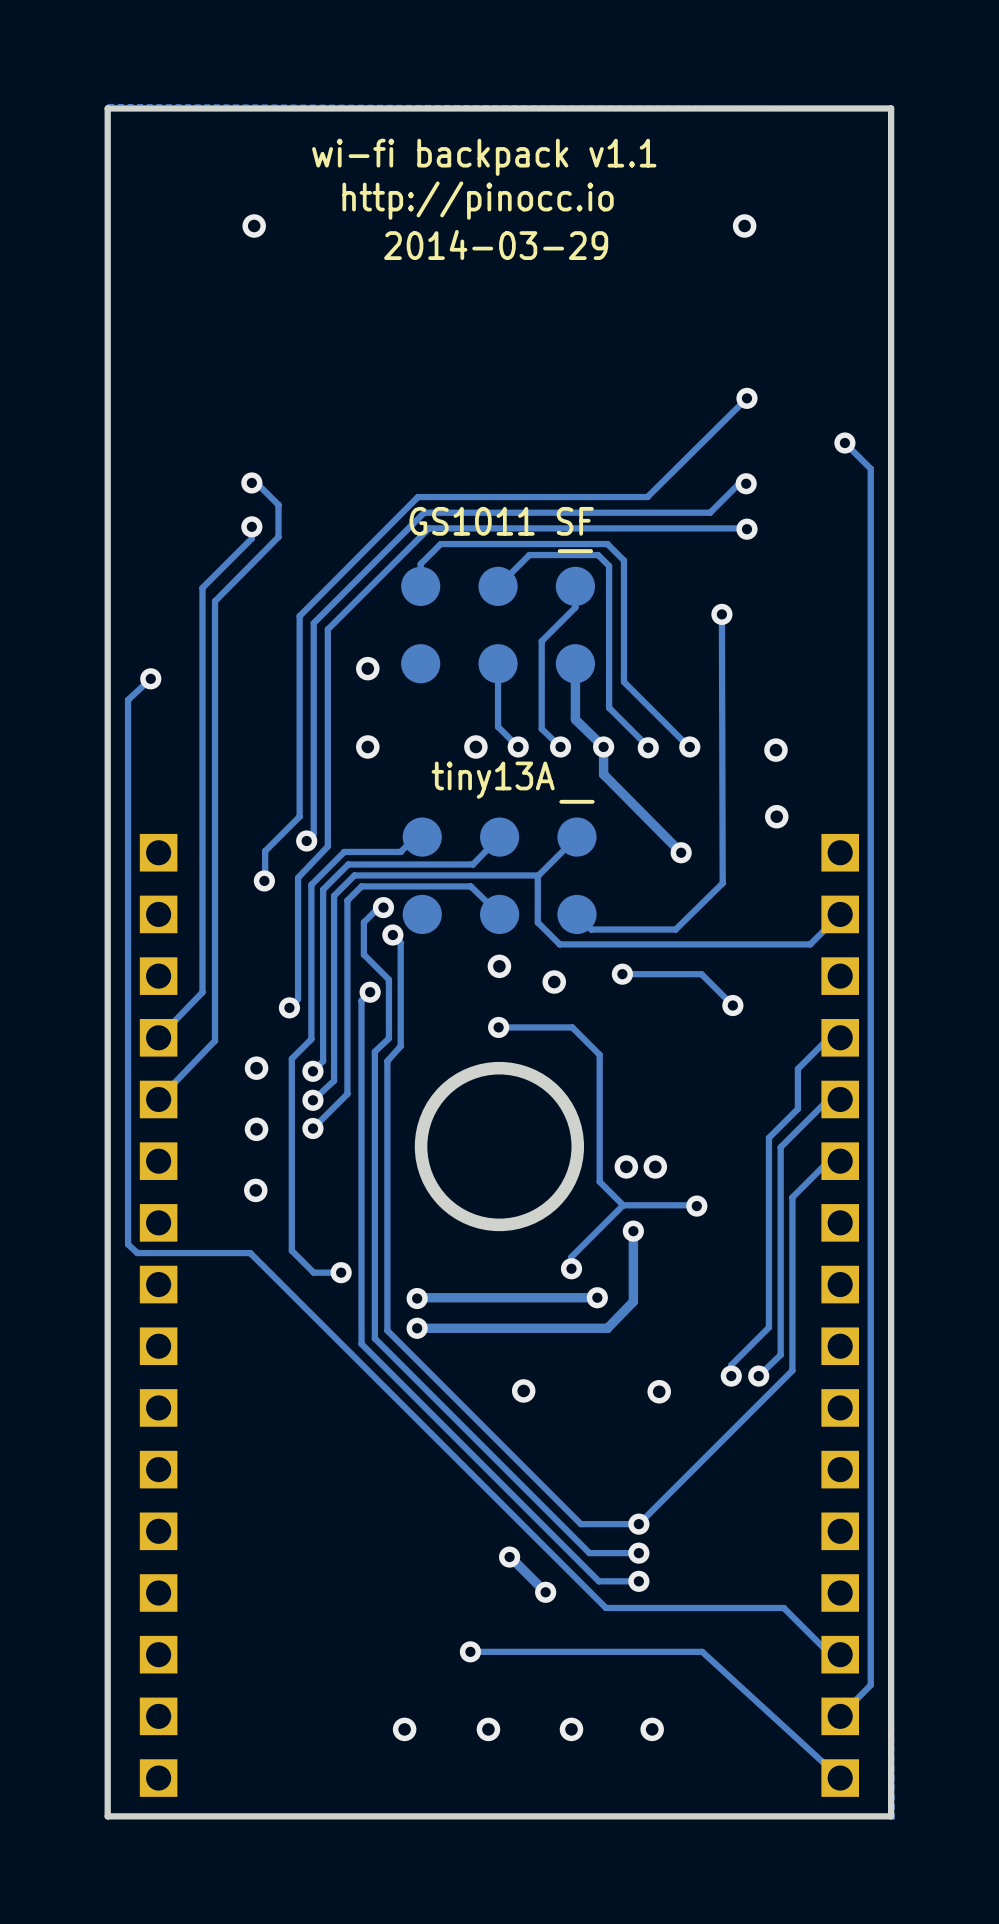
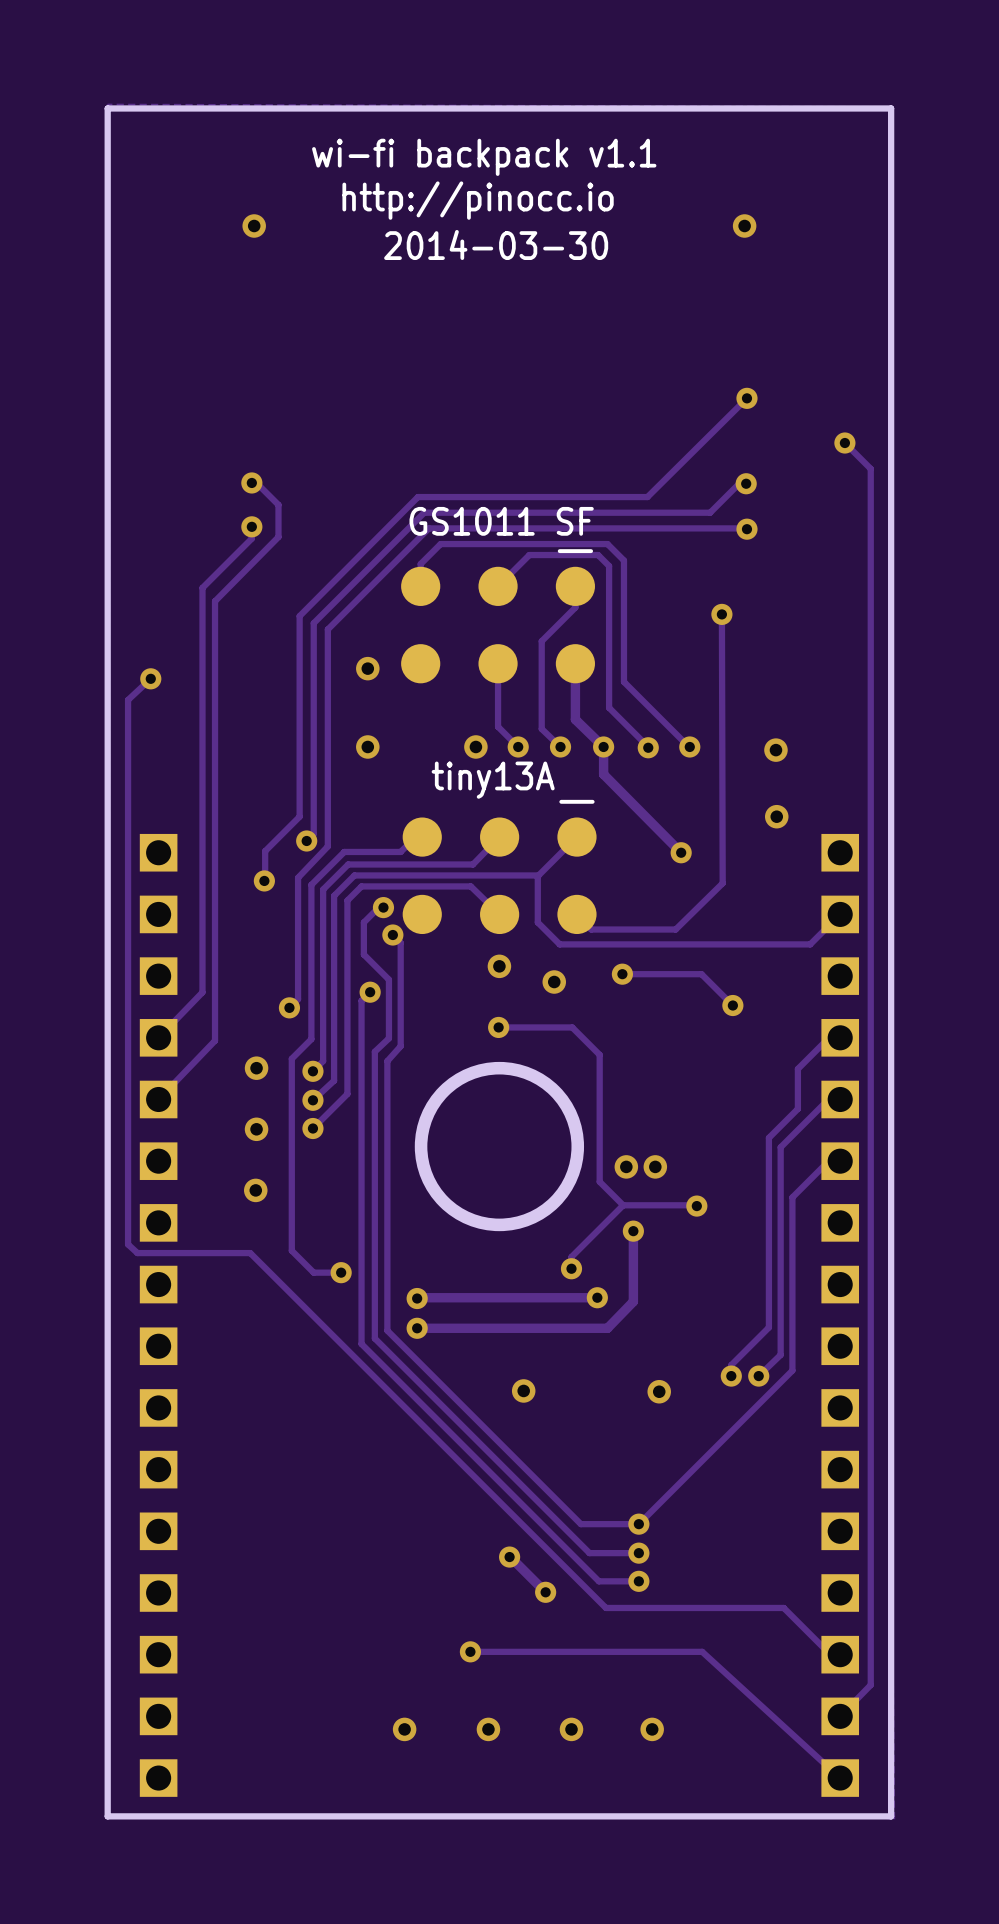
text: 2014-03-29 (496, 244) -> 2014-03-30 (496, 244)

